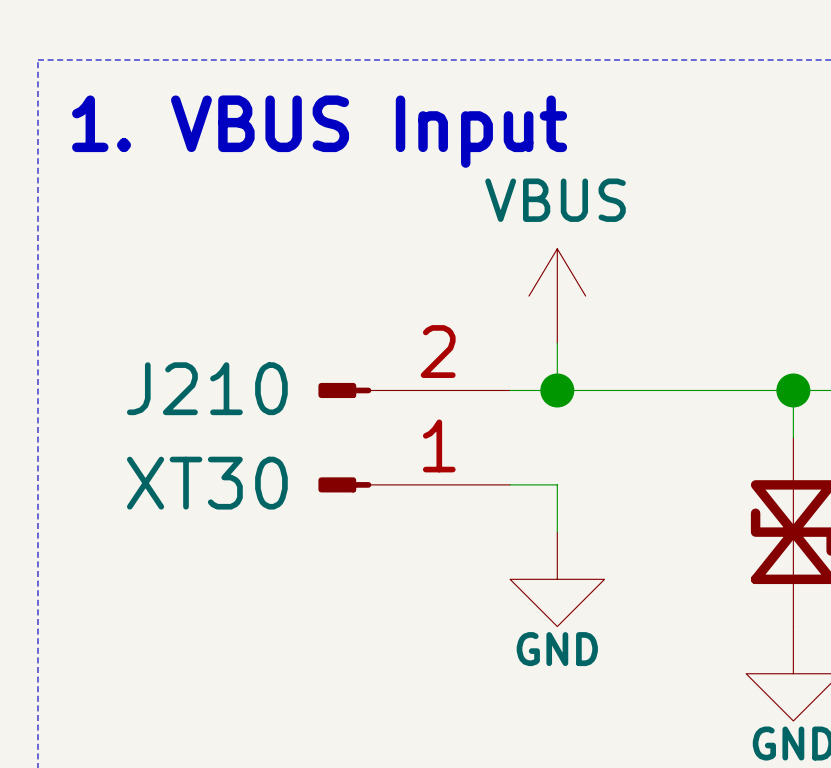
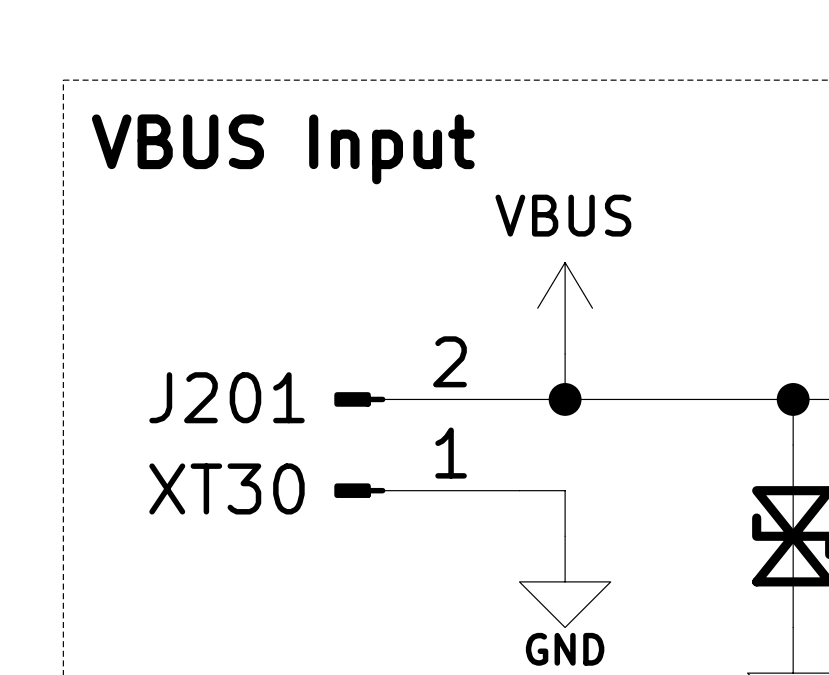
text: 1. VBUS Input (319, 131) -> VBUS Input (283, 149)
J210 name: J210 (207, 388) -> J201 (227, 397)

